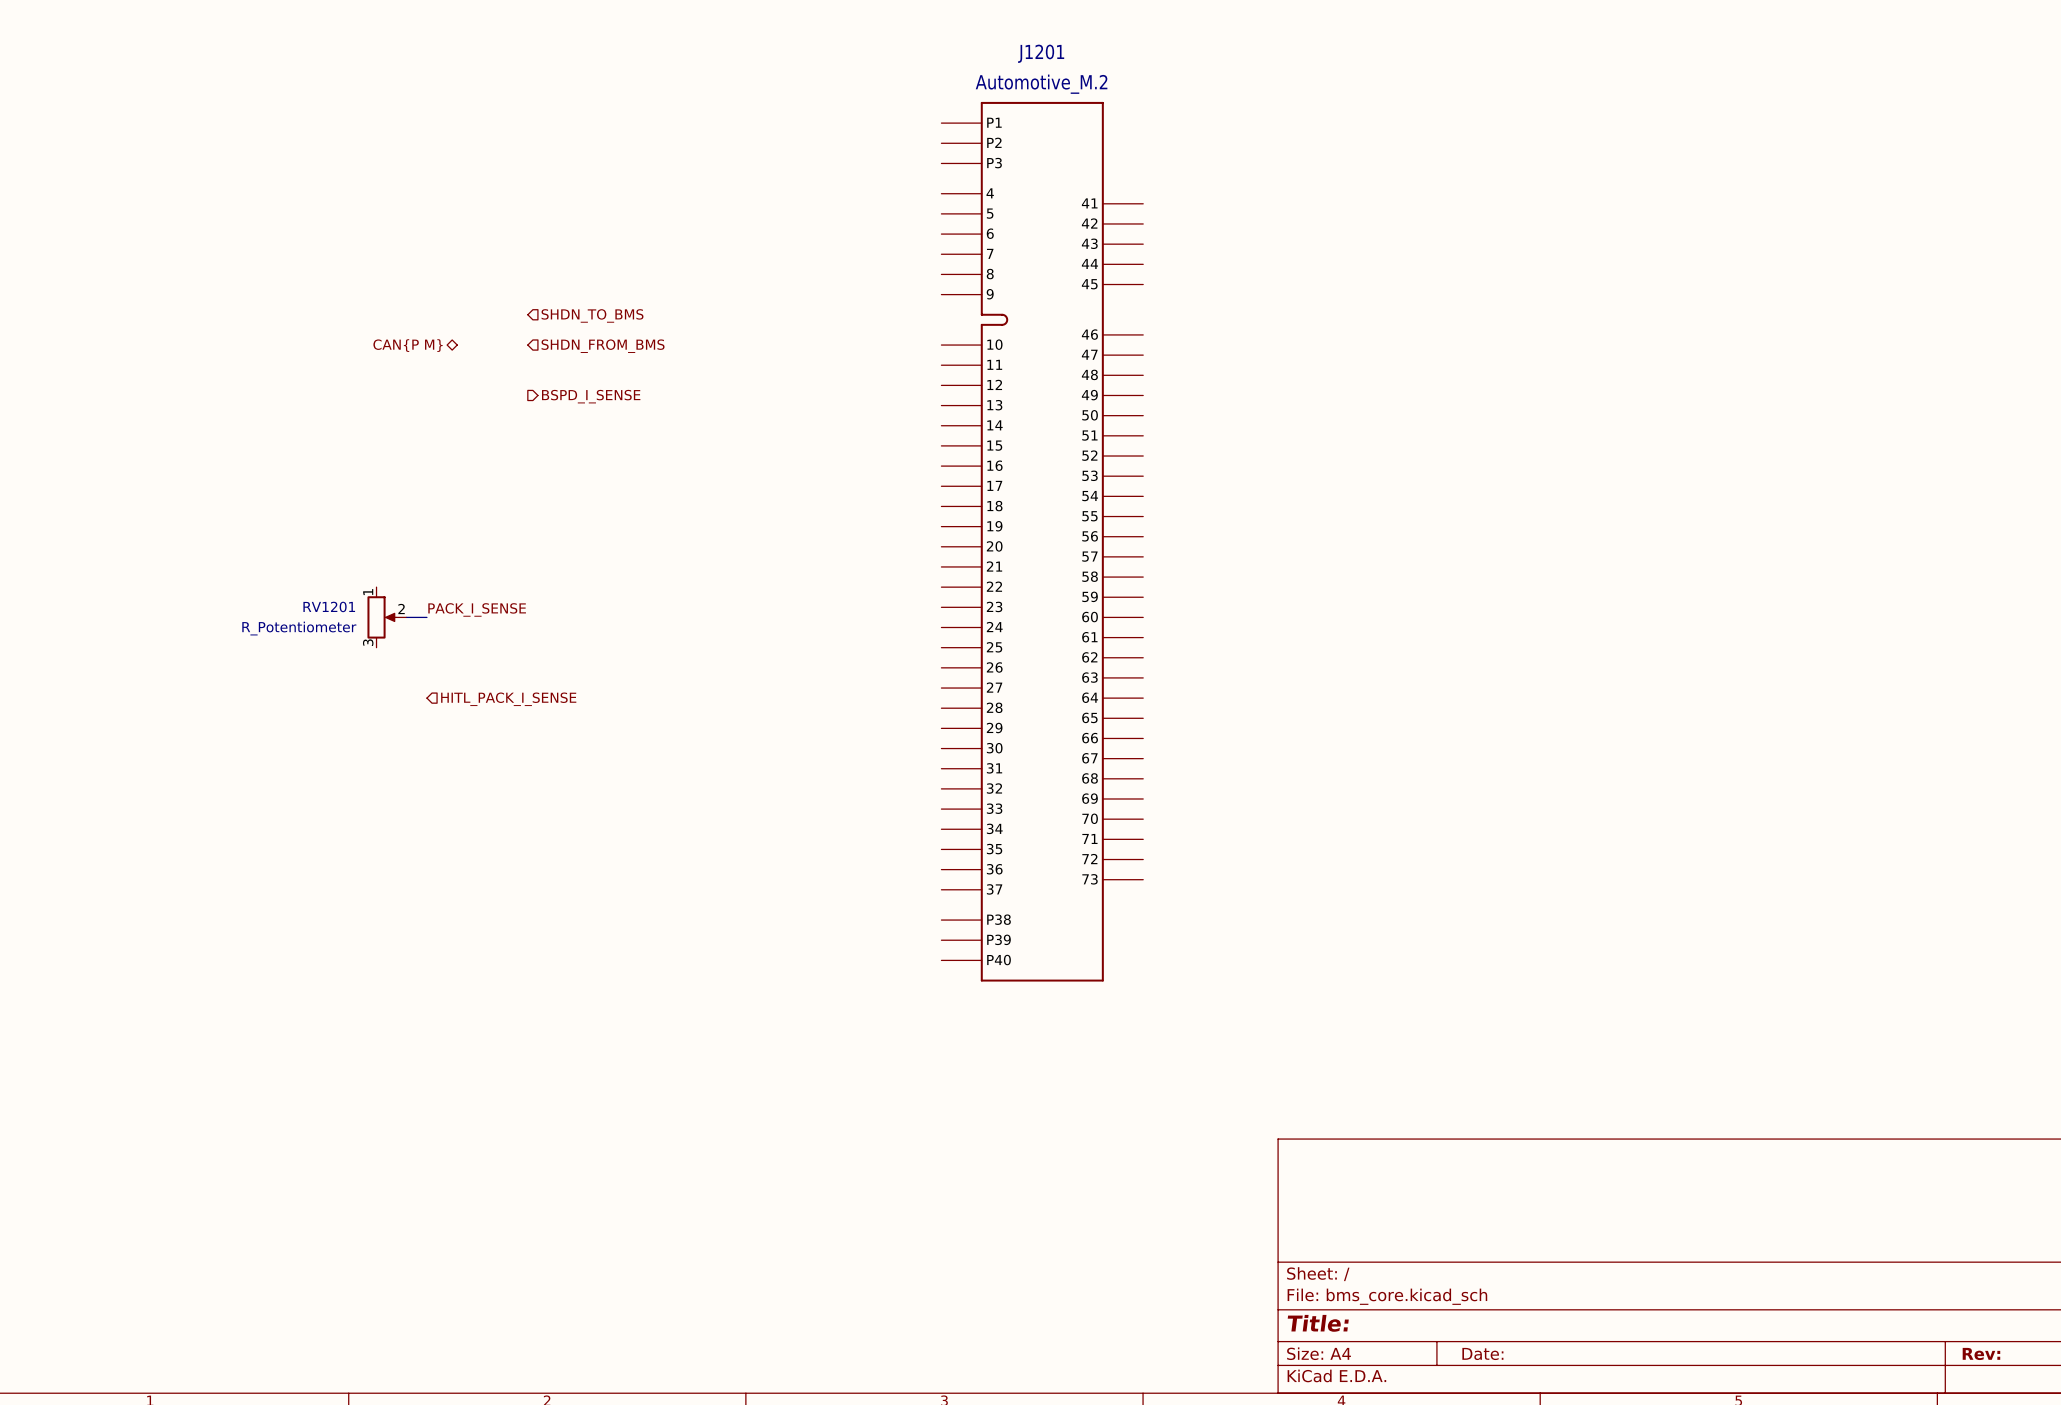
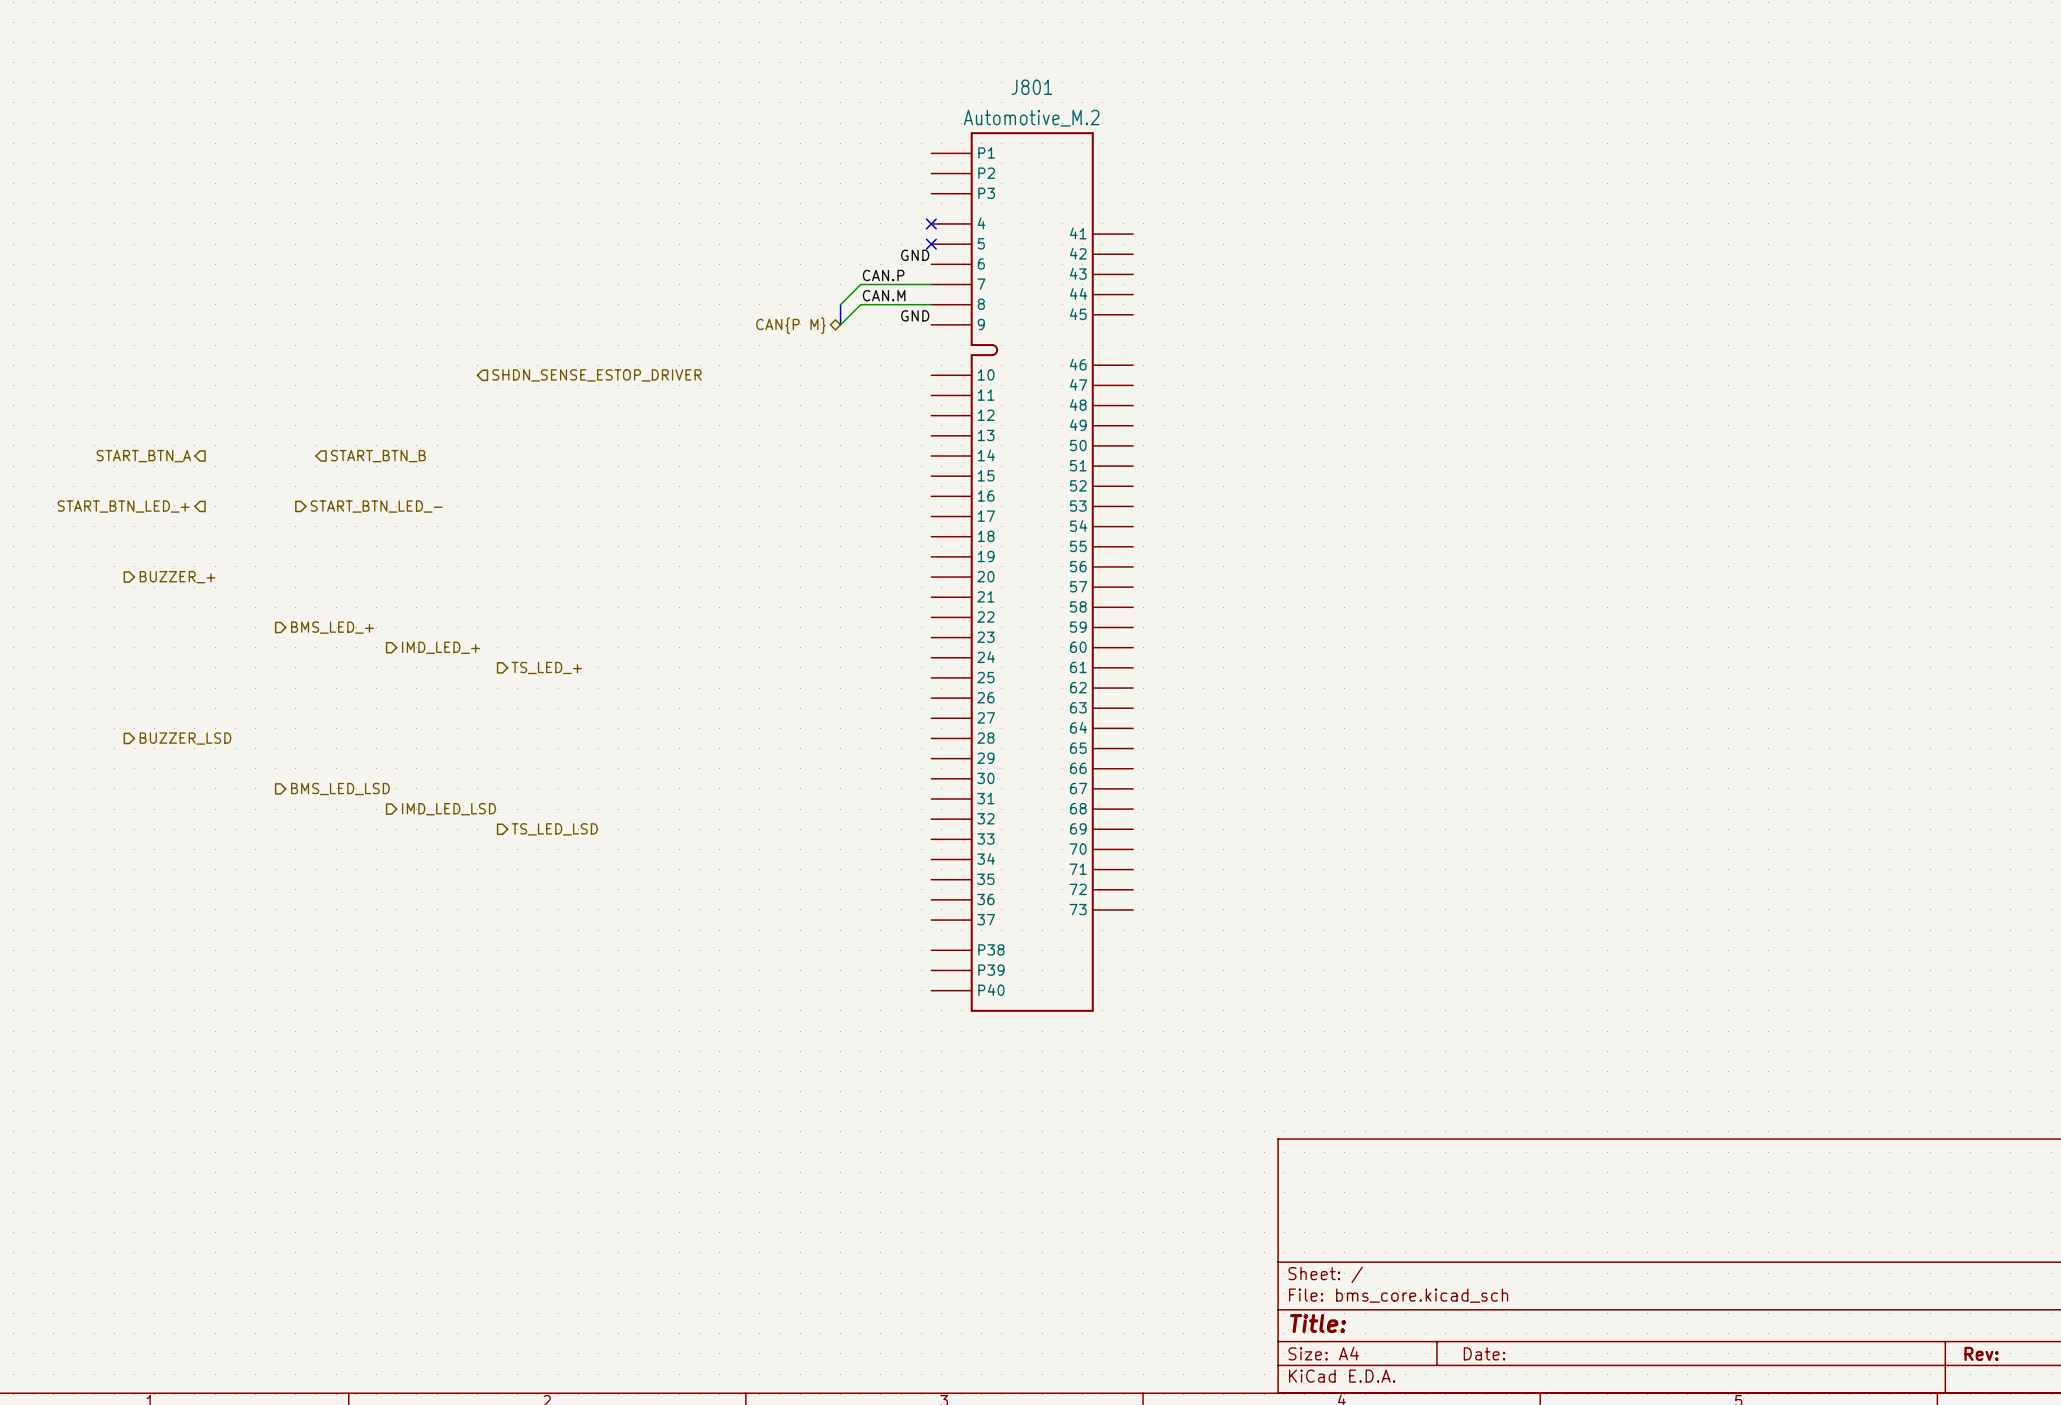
no-connect mark: none -> (931, 223)
no-connect mark: none -> (931, 244)
label: none -> GND (915, 255)
label: none -> CAN.P (883, 275)
wire: none -> (931, 284) (860, 284) (840, 304)
label: none -> CAN.M (884, 295)
bus: none -> (840, 304) (840, 324)
wire: none -> (931, 304) (860, 304) (840, 324)
hierarchical label: SHDN_TO_BMS (592, 315) -> none
label: none -> GND (915, 315)
hierarchical label: none -> CAN{P M} (790, 325)
hierarchical label: CAN{P M} (408, 345) -> none
hierarchical label: SHDN_FROM_BMS (603, 346) -> none
hierarchical label: none -> SHDN_SENSE_ESTOP_DRIVER (596, 375)
hierarchical label: BSPD_I_SENSE (591, 396) -> none
hierarchical label: none -> START_BTN_A (143, 456)
hierarchical label: none -> START_BTN_B (378, 456)
hierarchical label: none -> START_BTN_LED_+ (123, 506)
hierarchical label: none -> START_BTN_LED_- (376, 506)
J1201: Automotive_M.2 (1042, 541) -> none
J801: none -> Automotive_M.2 (1032, 572)
hierarchical label: none -> BUZZER_+ (177, 577)
label: PACK_I_SENSE (477, 609) -> none
RV1201: R_Potentiometer (387, 617) -> none
wire: (406, 617) (426, 617) -> none
hierarchical label: none -> BMS_LED_+ (332, 627)
hierarchical label: none -> IMD_LED_+ (441, 647)
hierarchical label: none -> TS_LED_+ (546, 667)
hierarchical label: HITL_PACK_I_SENSE (508, 699) -> none
hierarchical label: none -> BUZZER_LSD (185, 738)
hierarchical label: none -> BMS_LED_LSD (340, 789)
hierarchical label: none -> IMD_LED_LSD (448, 809)
hierarchical label: none -> TS_LED_LSD (554, 829)

